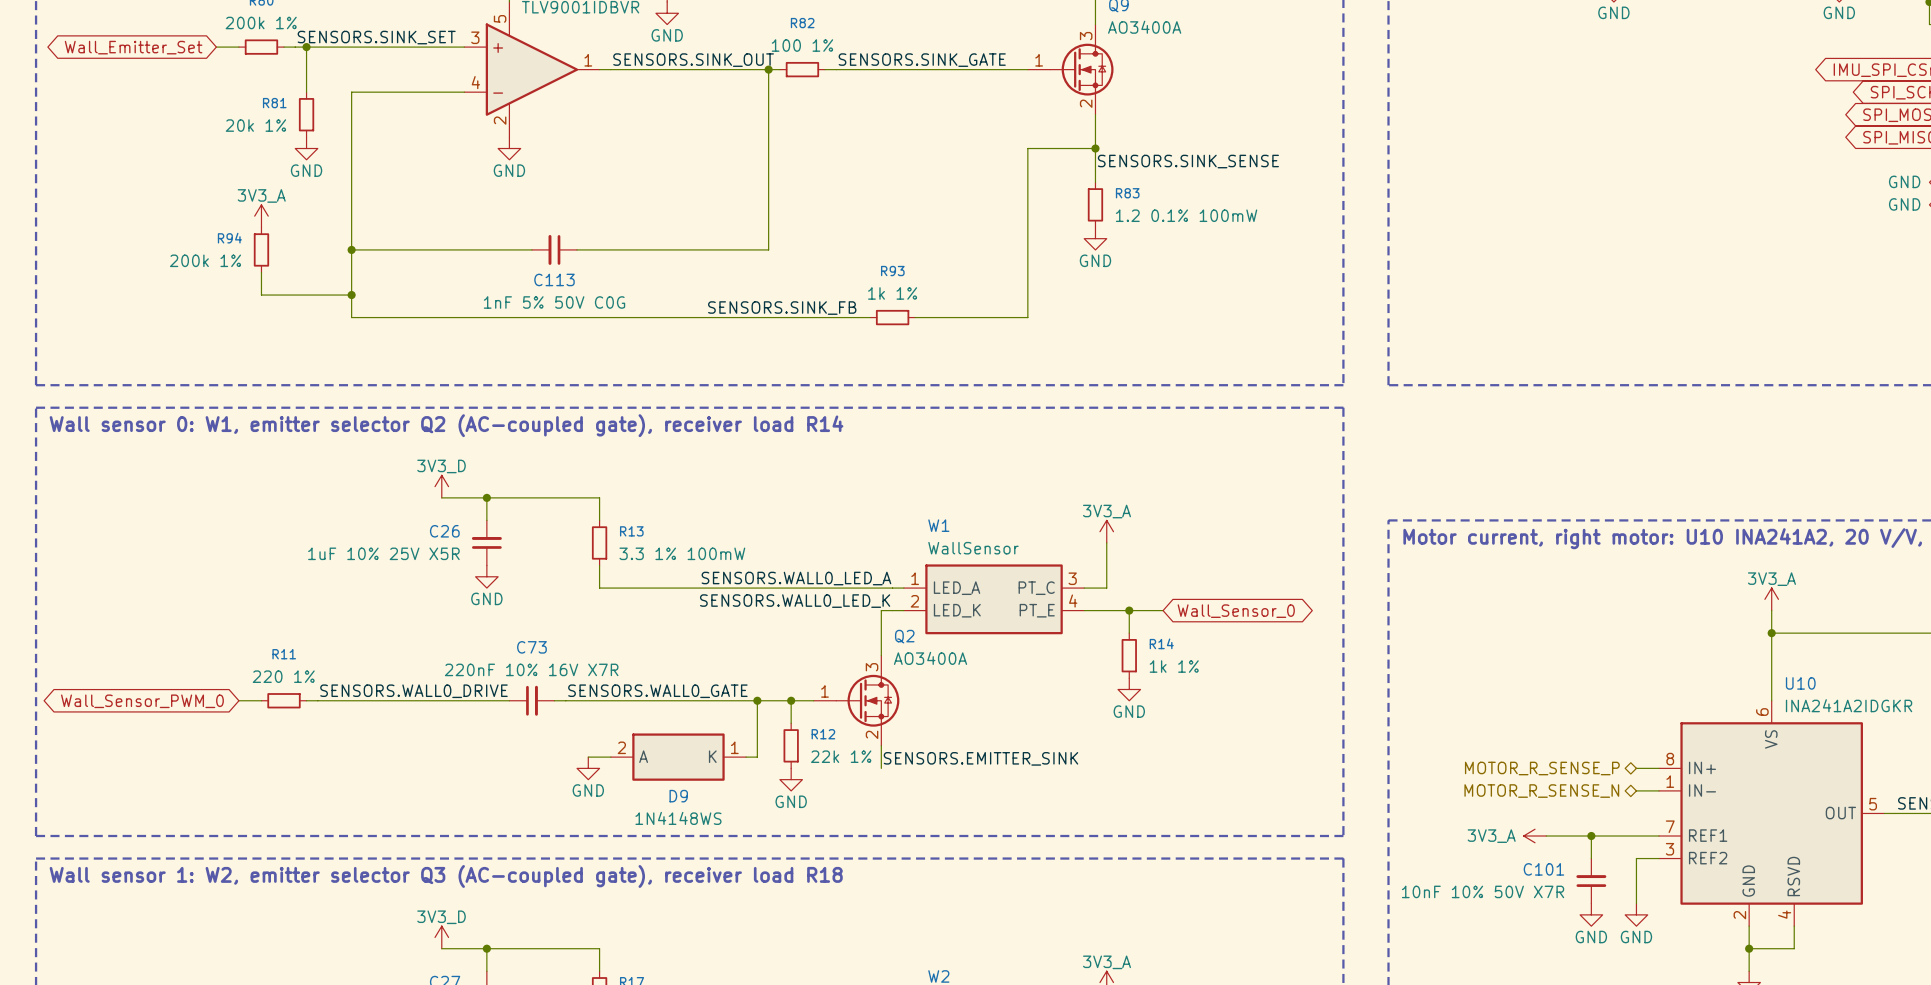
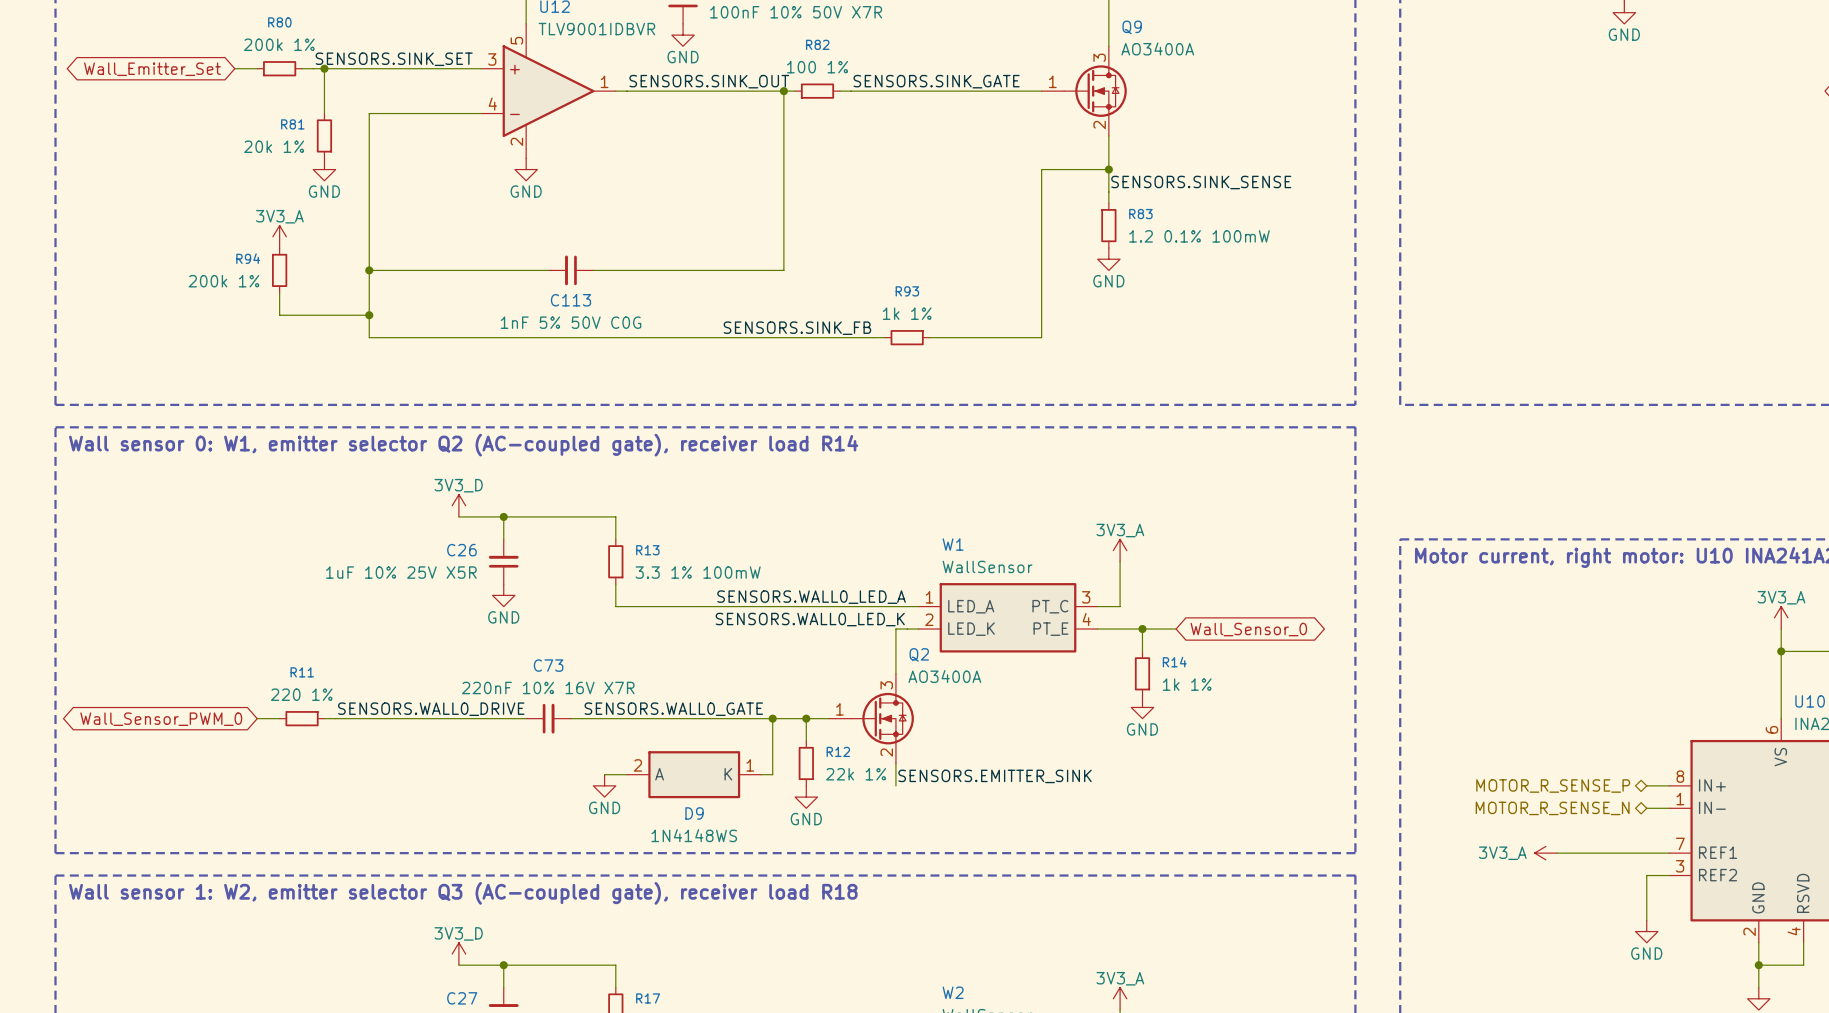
wire: (1591, 836) (1591, 858) -> none
junction: (1591, 836) -> none
C101: 10nF 10% 50V X7R (1591, 881) -> none
power symbol: GND (1591, 914) -> none

